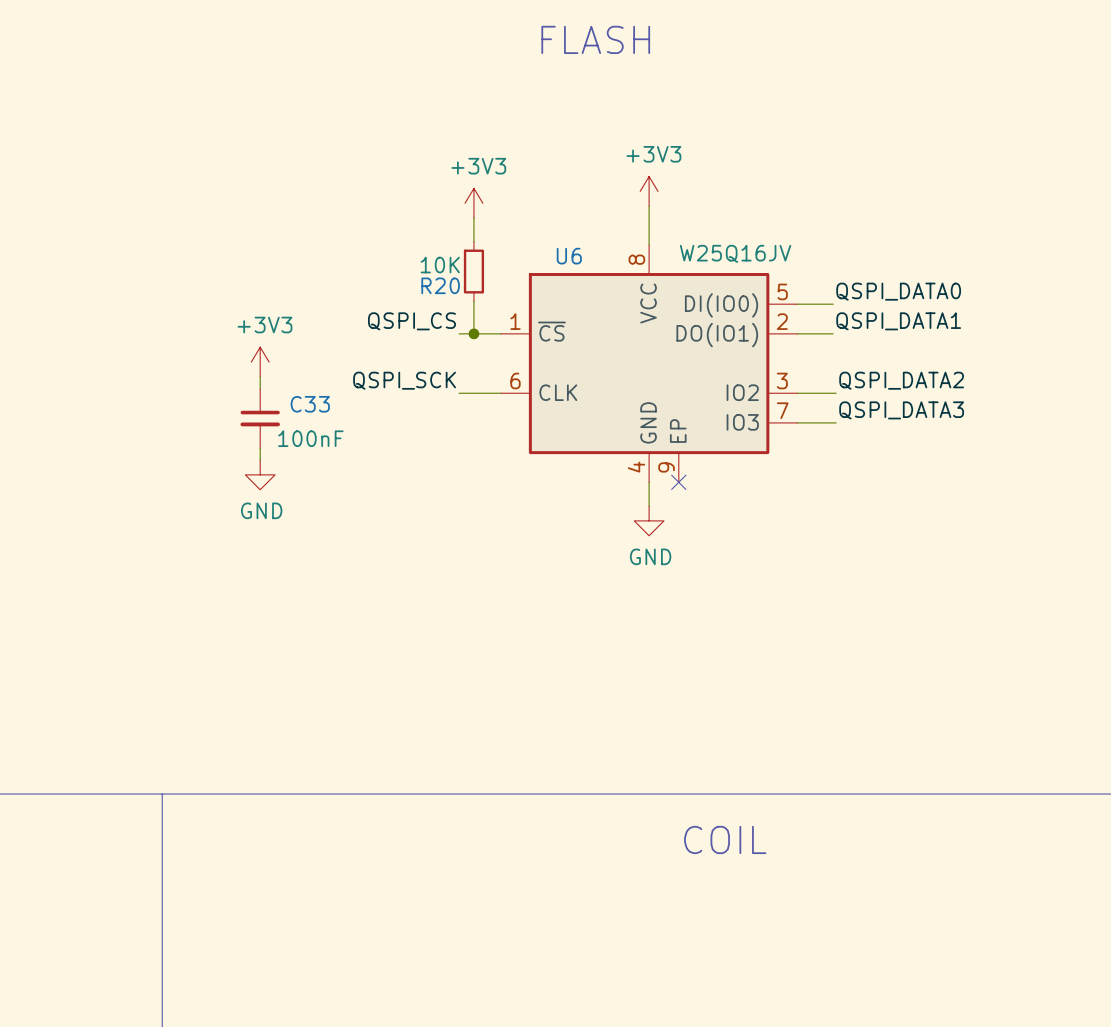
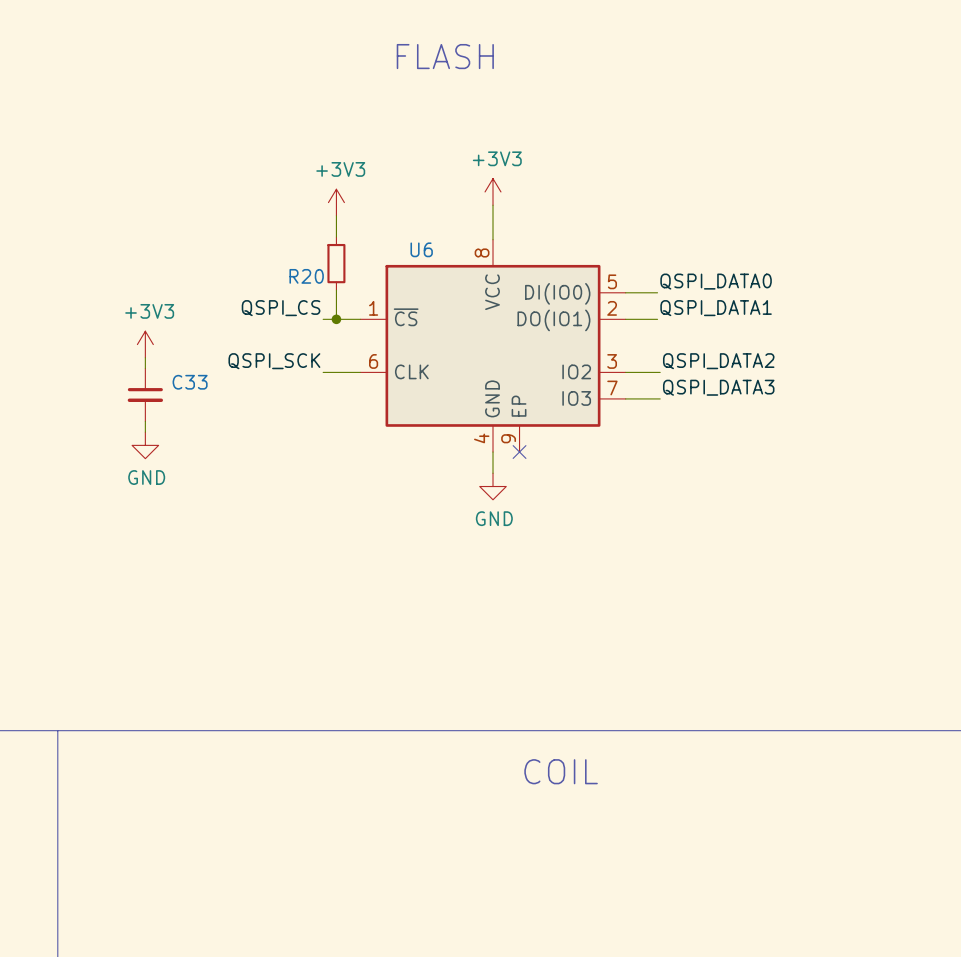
U6 value: W25Q16JV (735, 253) -> none
R20 value: 10K (440, 265) -> none
C33 value: 100nF (310, 438) -> none

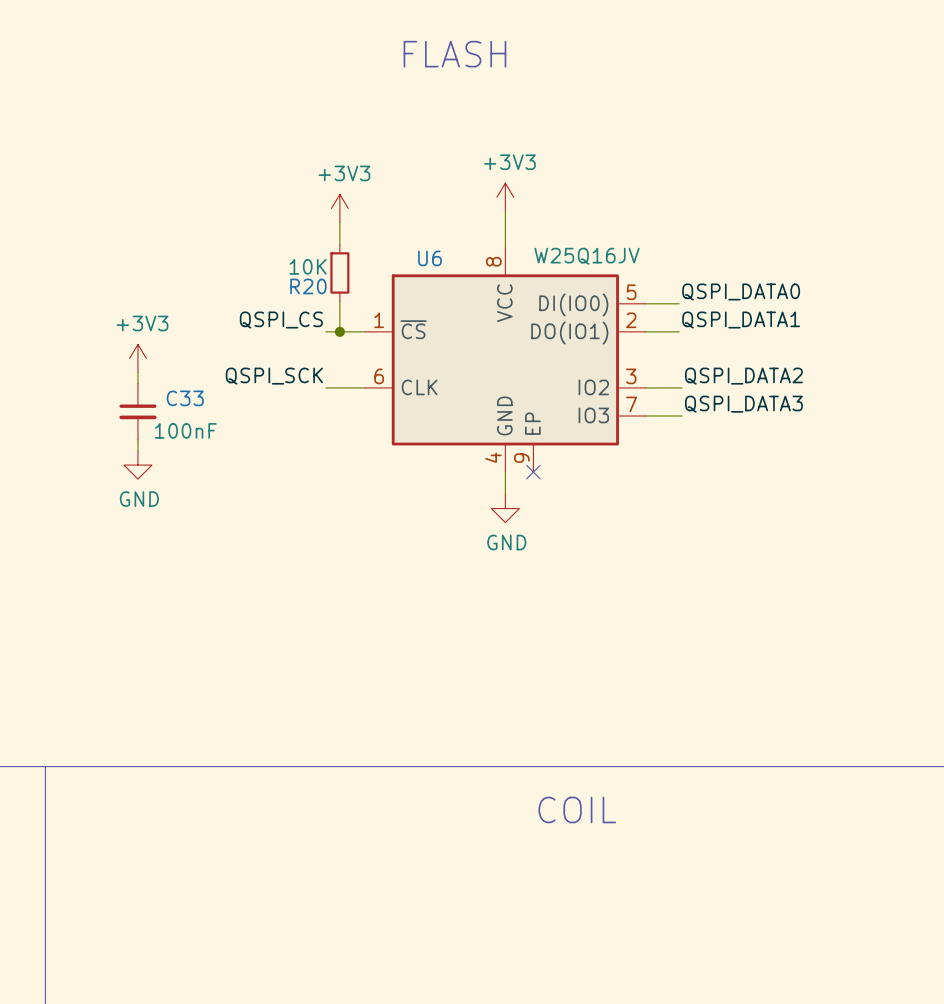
U6 value: none -> W25Q16JV (587, 256)
R20 value: none -> 10K (308, 266)
C33 value: none -> 100nF (185, 430)

